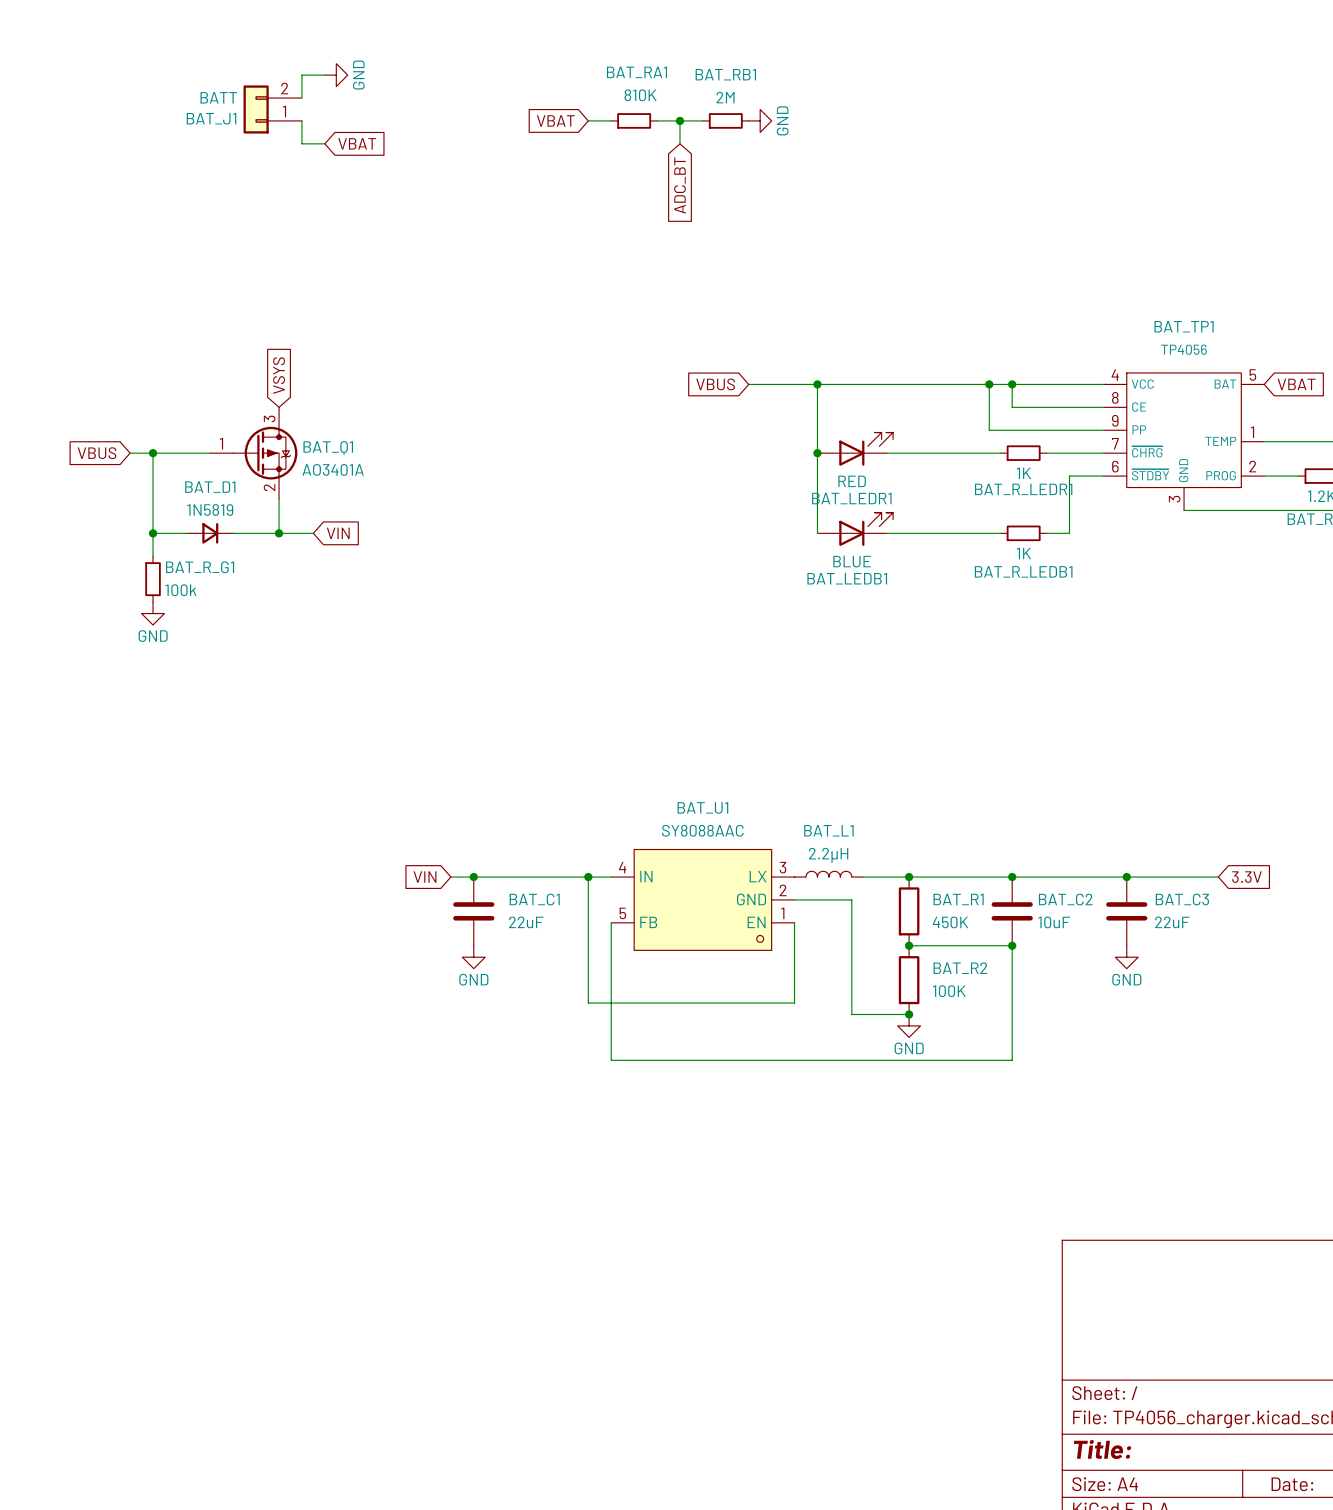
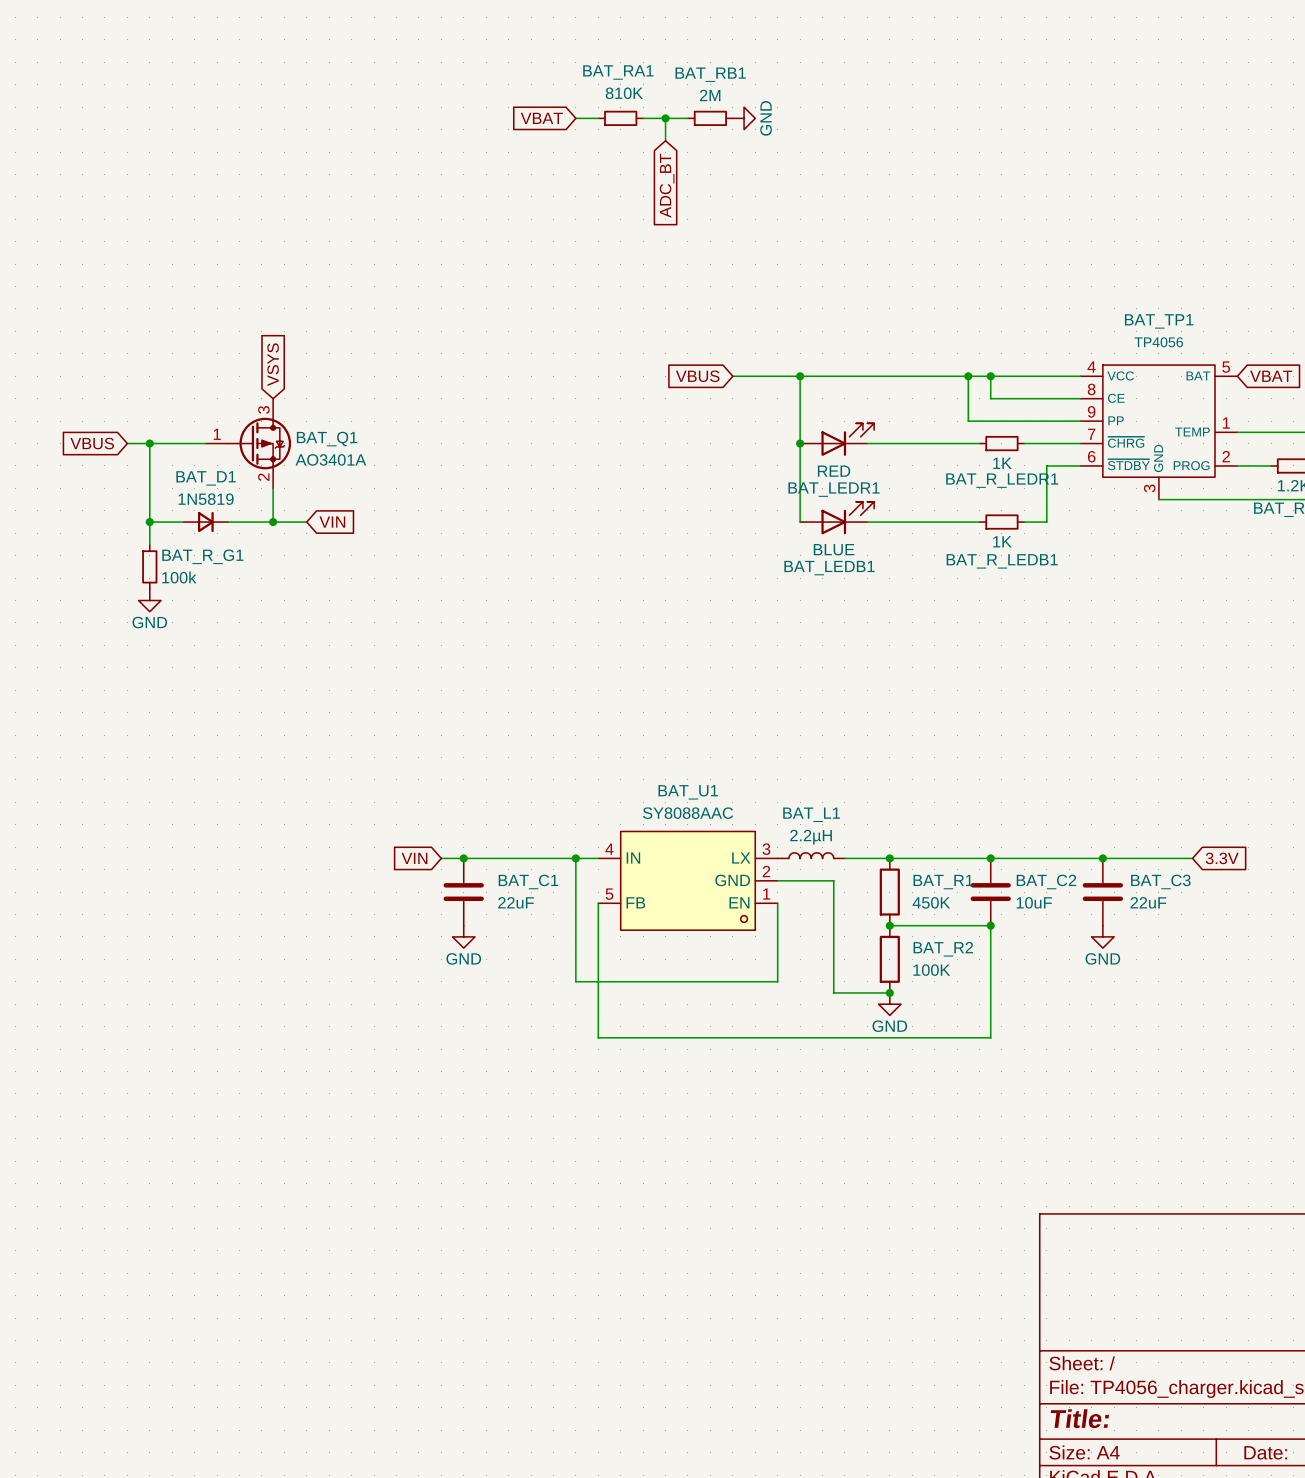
wire: (324, 75) (301, 75) (301, 98) -> none
power symbol: GND (336, 75) -> none
BAT_J1: BATT (272, 109) -> none
wire: (301, 120) (301, 143) (324, 143) -> none
global label: VBAT (357, 143) -> none

